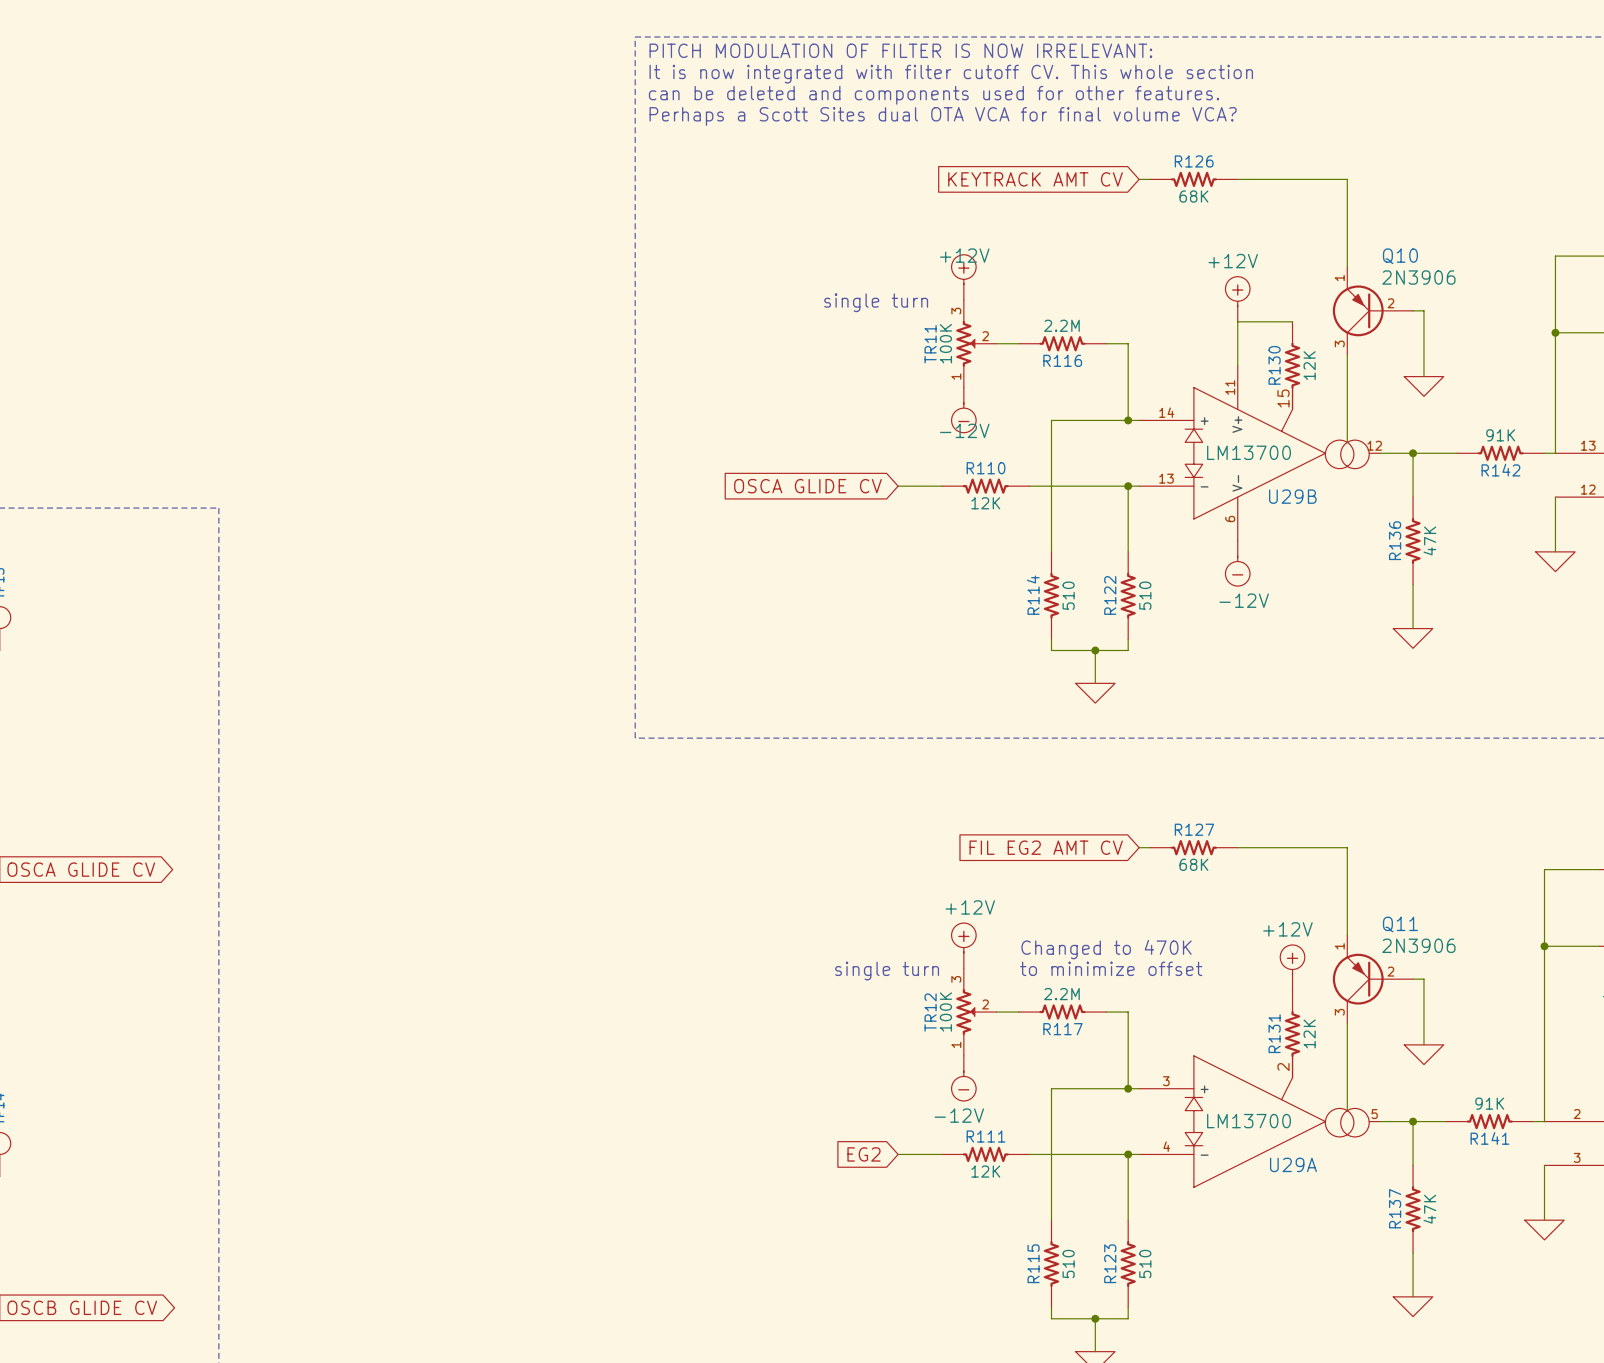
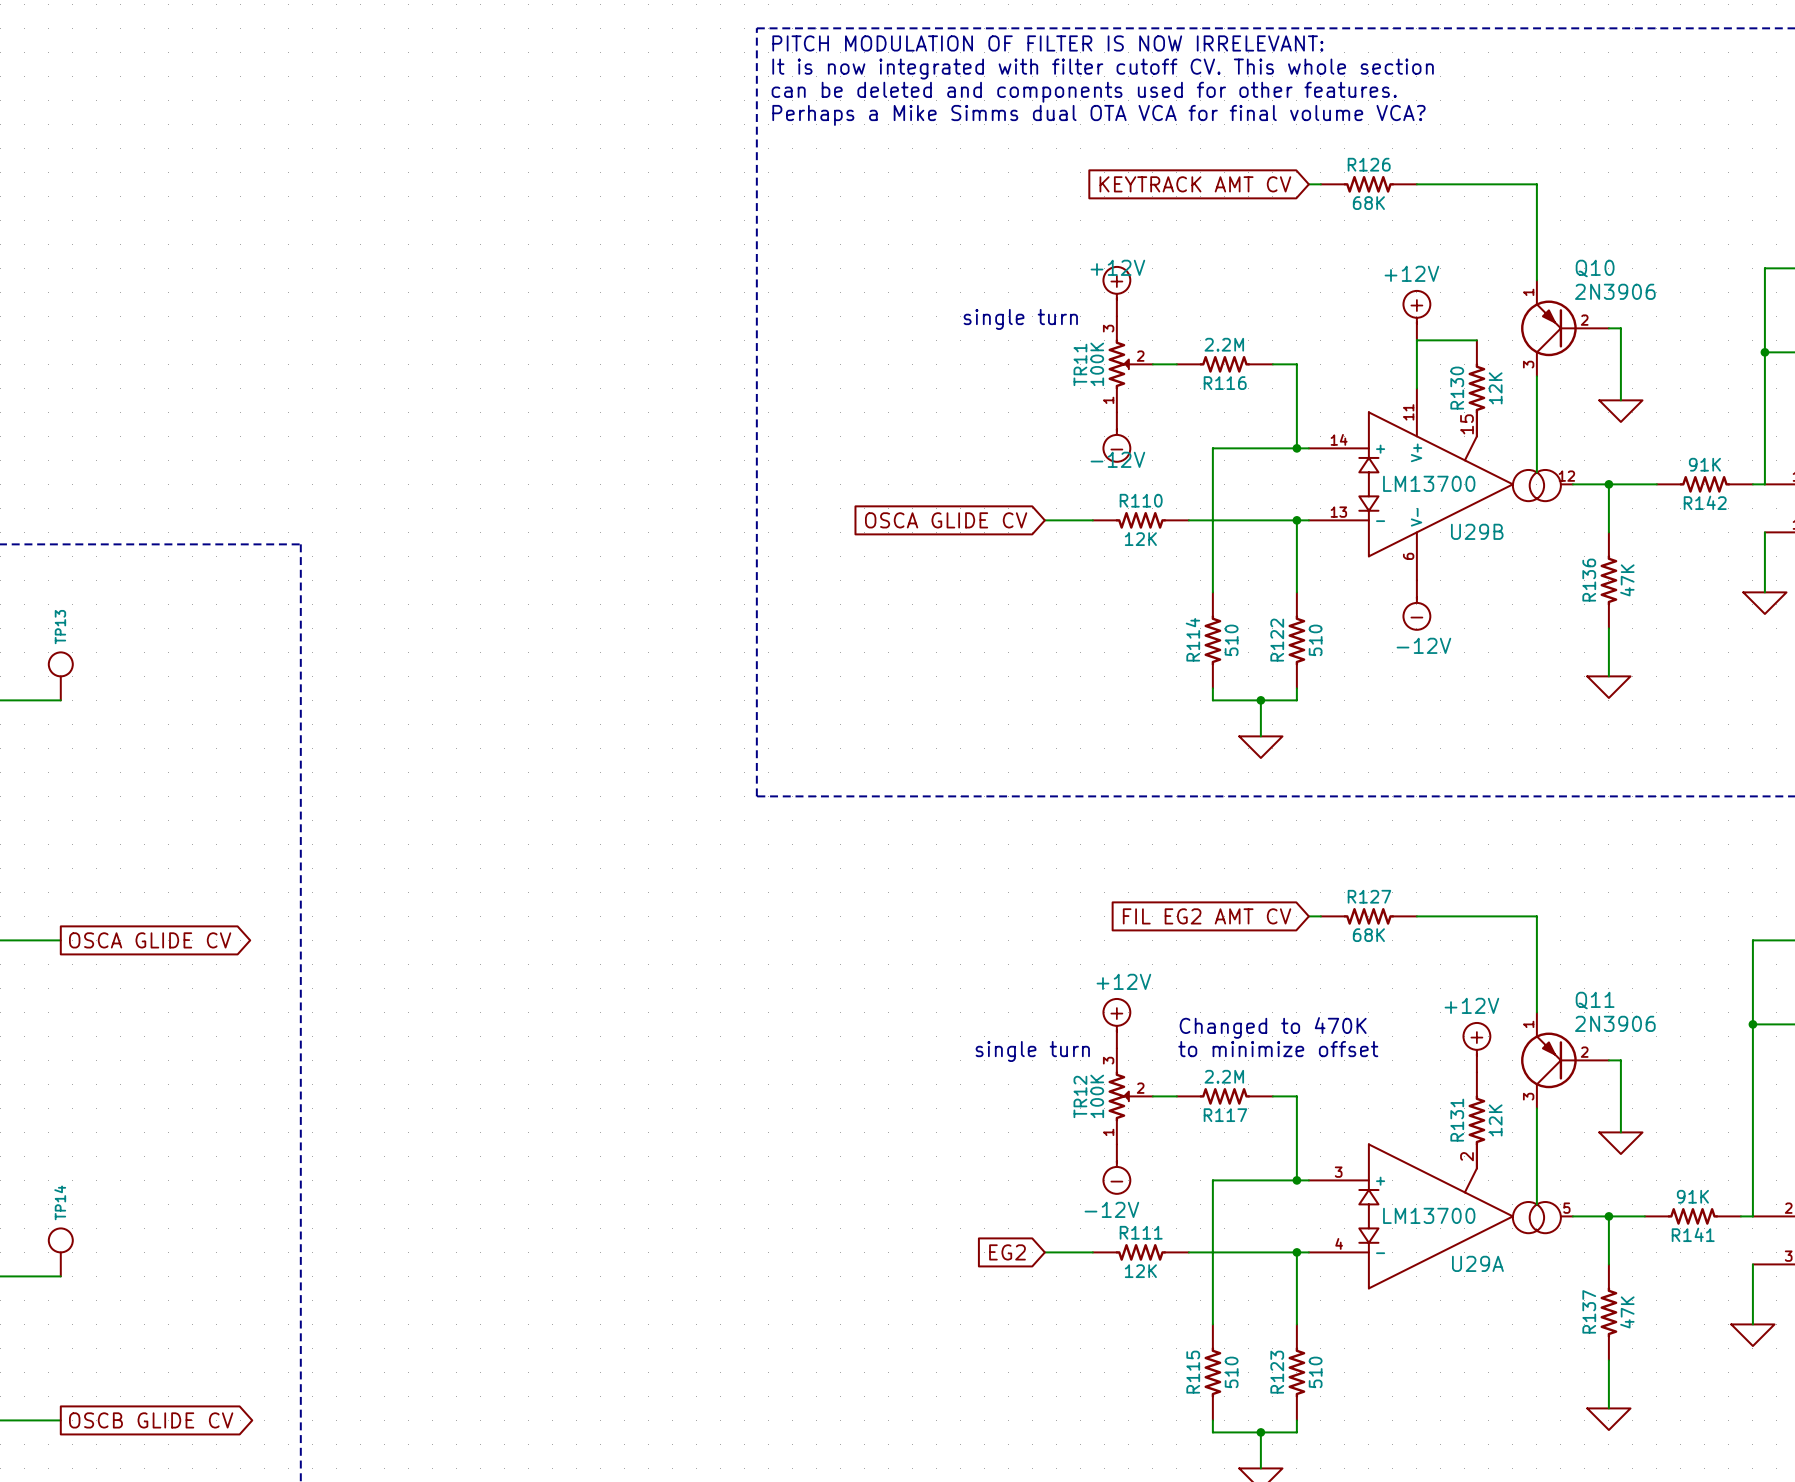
text: Perhaps a Scott Sites dual OTA VCA for final volume VCA? (943, 116) -> Perhaps a Mike Simms dual OTA VCA for final volume VCA? (1098, 115)

